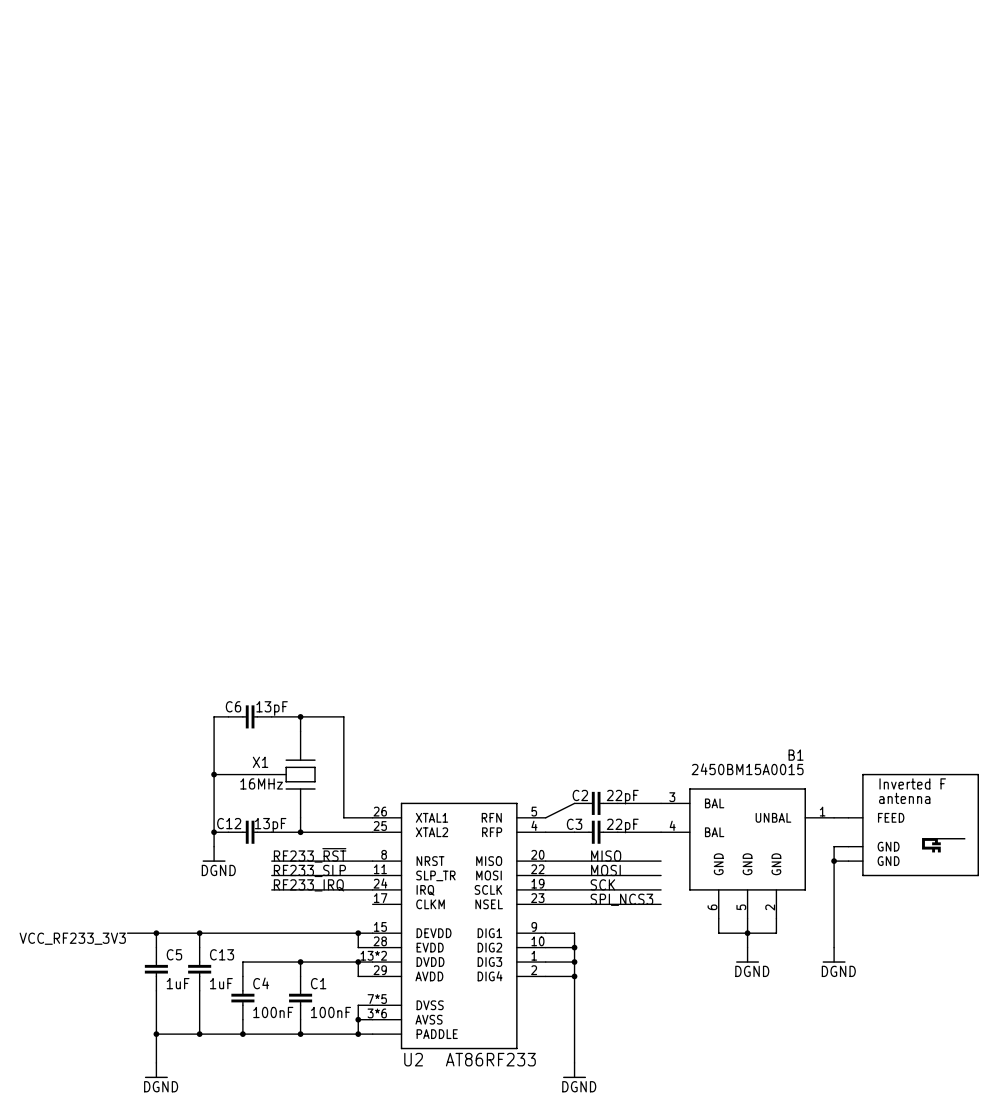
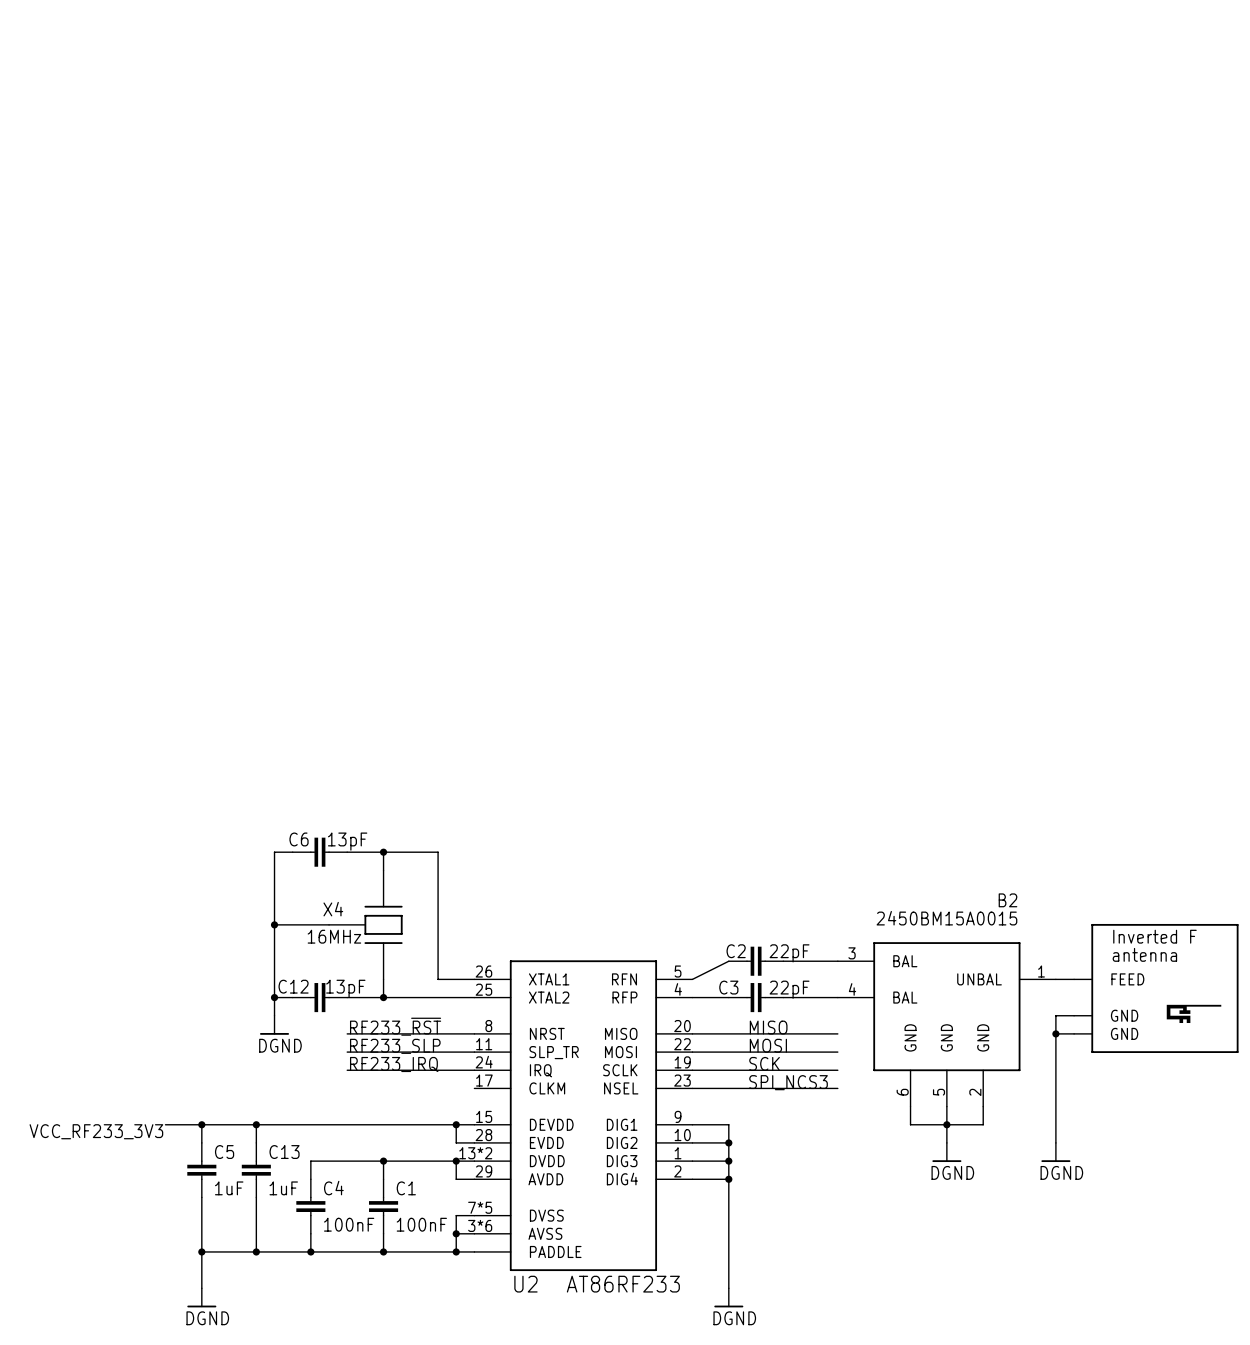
B1 name: B1 (796, 755) -> B2 (1007, 900)
X1 name: X1 (260, 762) -> X4 (333, 909)

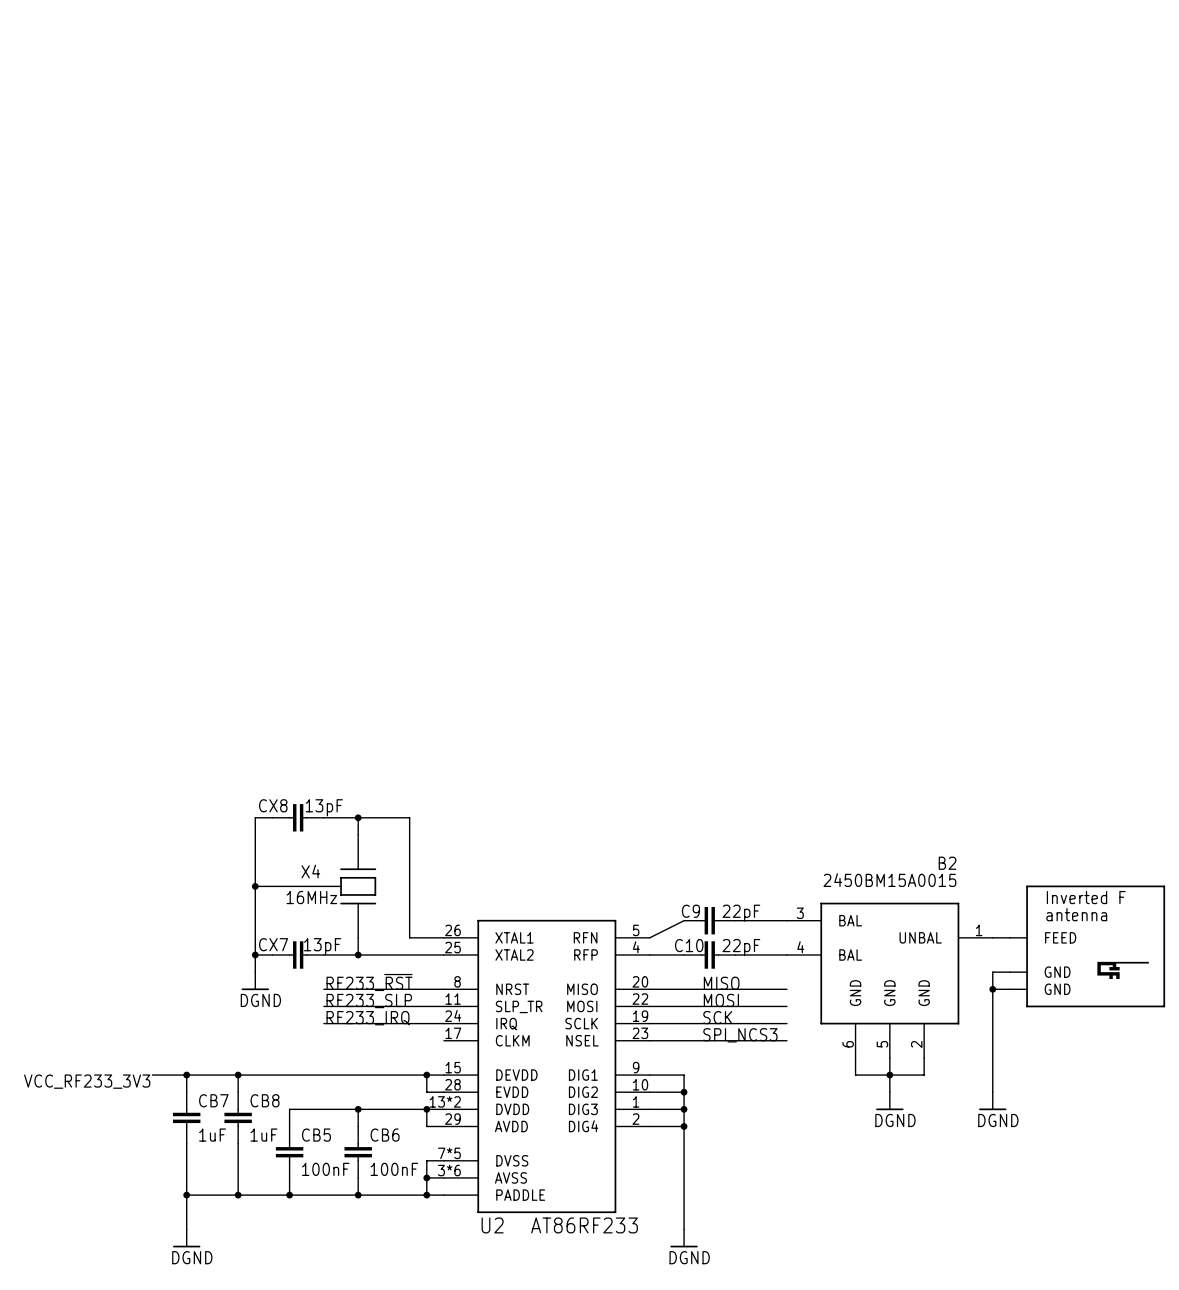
C6 name: C6 (299, 839) -> CX8 (273, 805)
C2 name: C2 (736, 951) -> C9 (690, 911)
C12 name: C12 (293, 986) -> CX7 (273, 944)
C3 name: C3 (728, 987) -> C10 (689, 945)
C5 name: C5 (224, 1152) -> CB7 (213, 1100)
C13 name: C13 (284, 1152) -> CB8 (265, 1100)
C4 name: C4 (333, 1188) -> CB5 (316, 1135)
C1 name: C1 (406, 1188) -> CB6 (385, 1135)

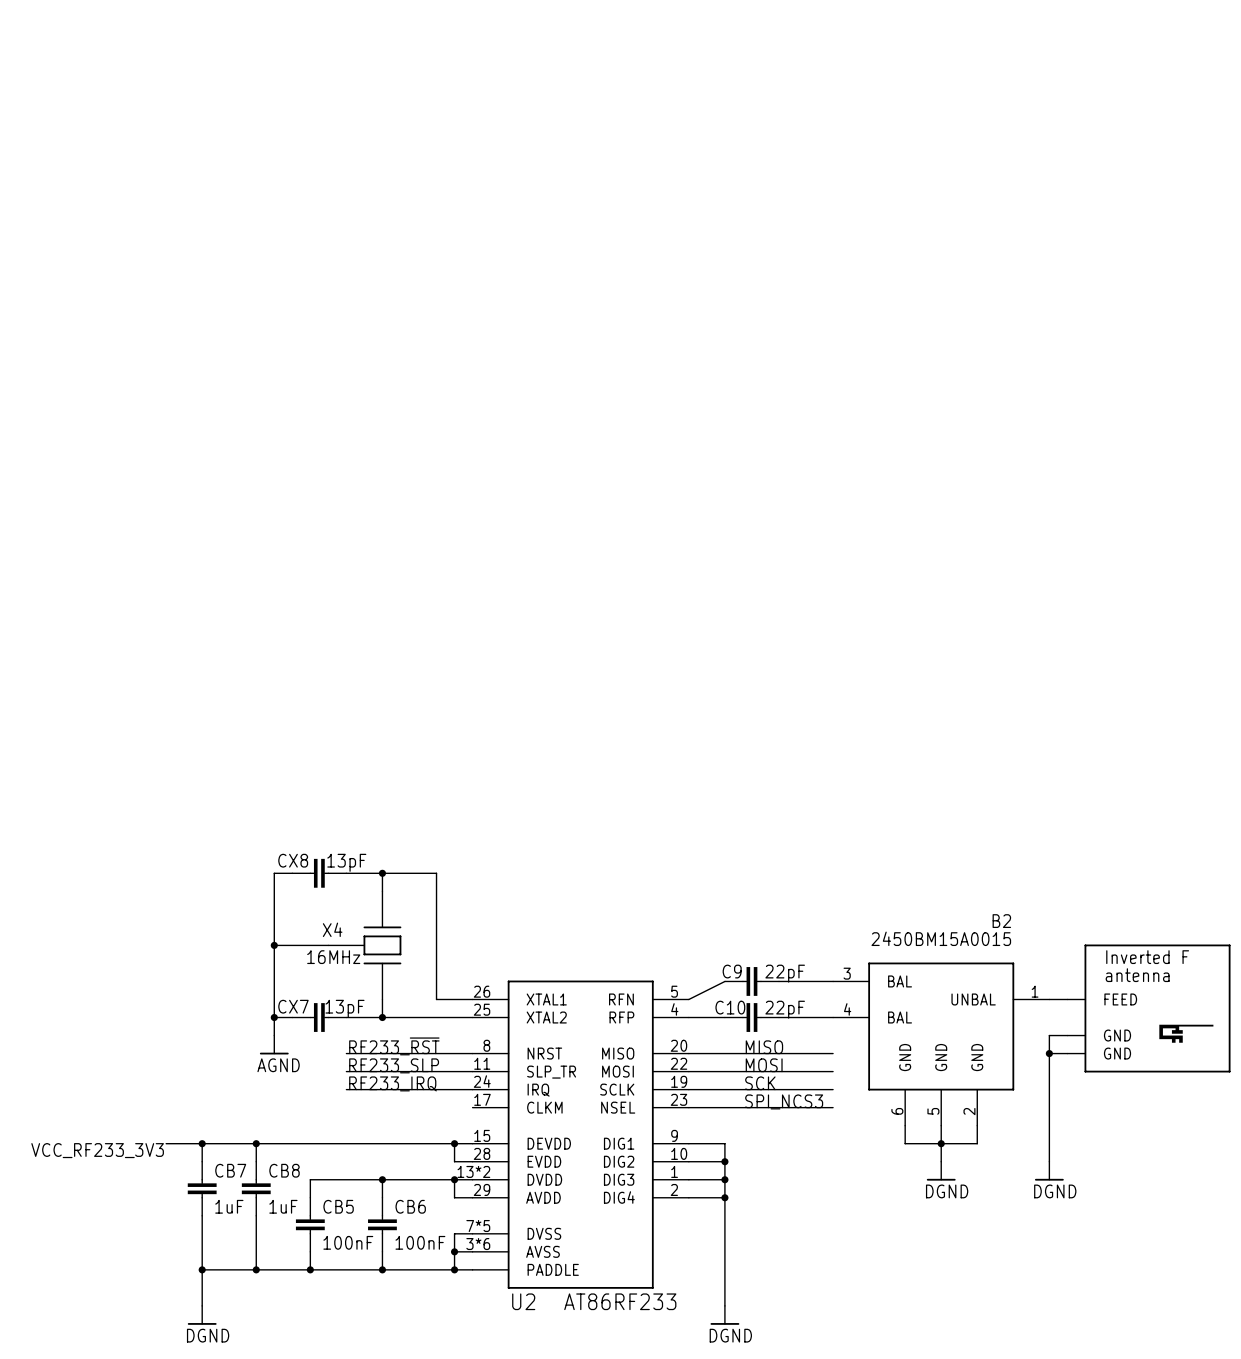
power symbol: DGND (255, 981) -> AGND (274, 1045)

